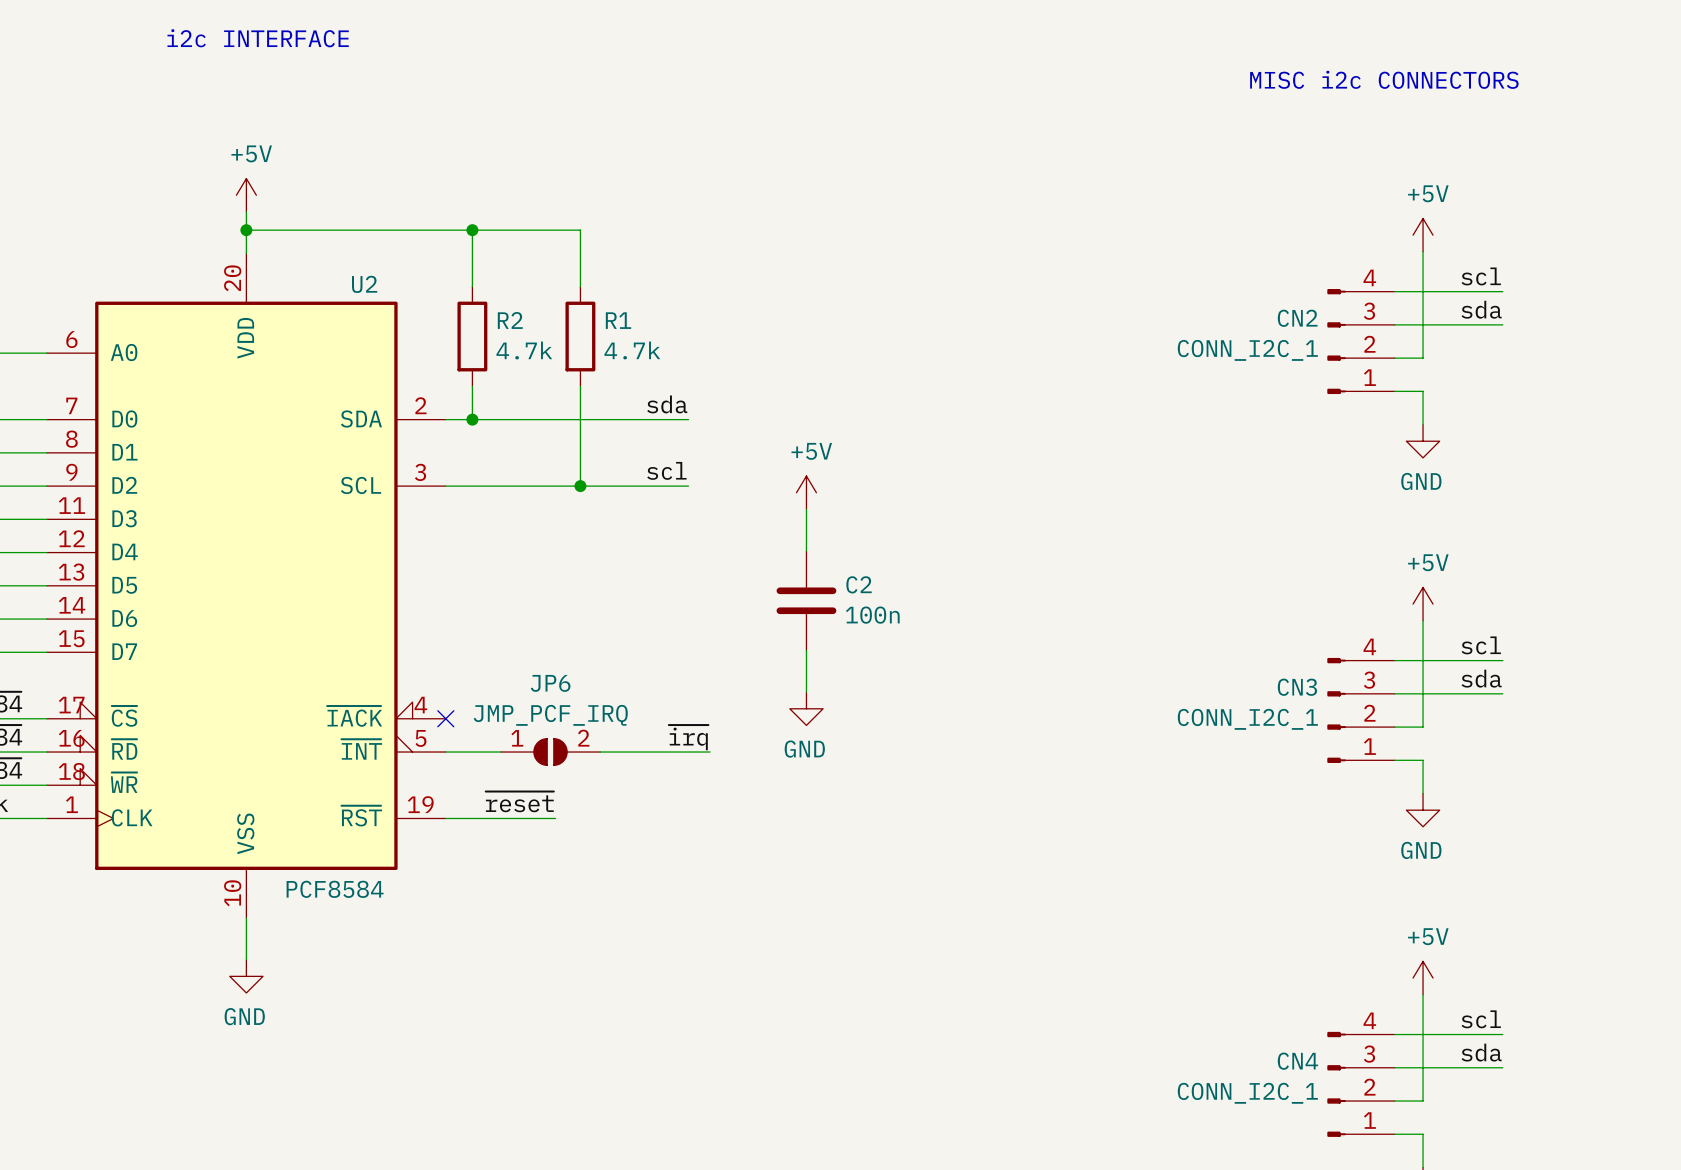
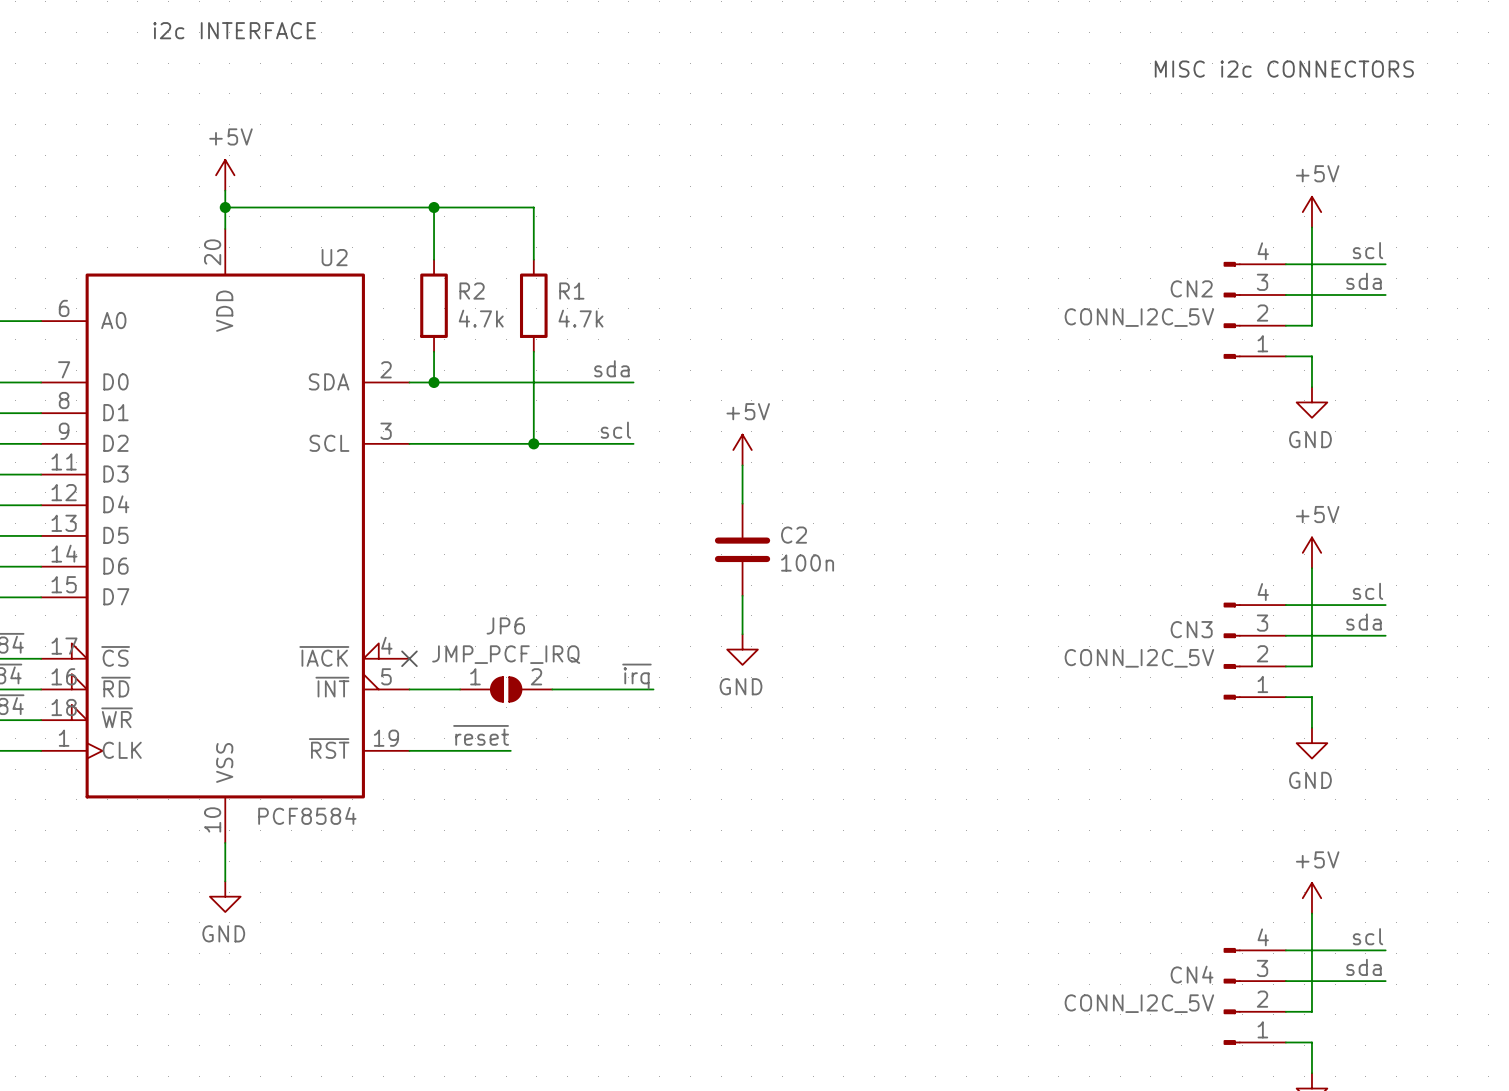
CN2 value: CONN_I2C_1 (1247, 350) -> CONN_I2C_5V (1139, 317)
CN3 value: CONN_I2C_1 (1247, 719) -> CONN_I2C_5V (1139, 658)
CN4 value: CONN_I2C_1 (1247, 1093) -> CONN_I2C_5V (1139, 1003)

